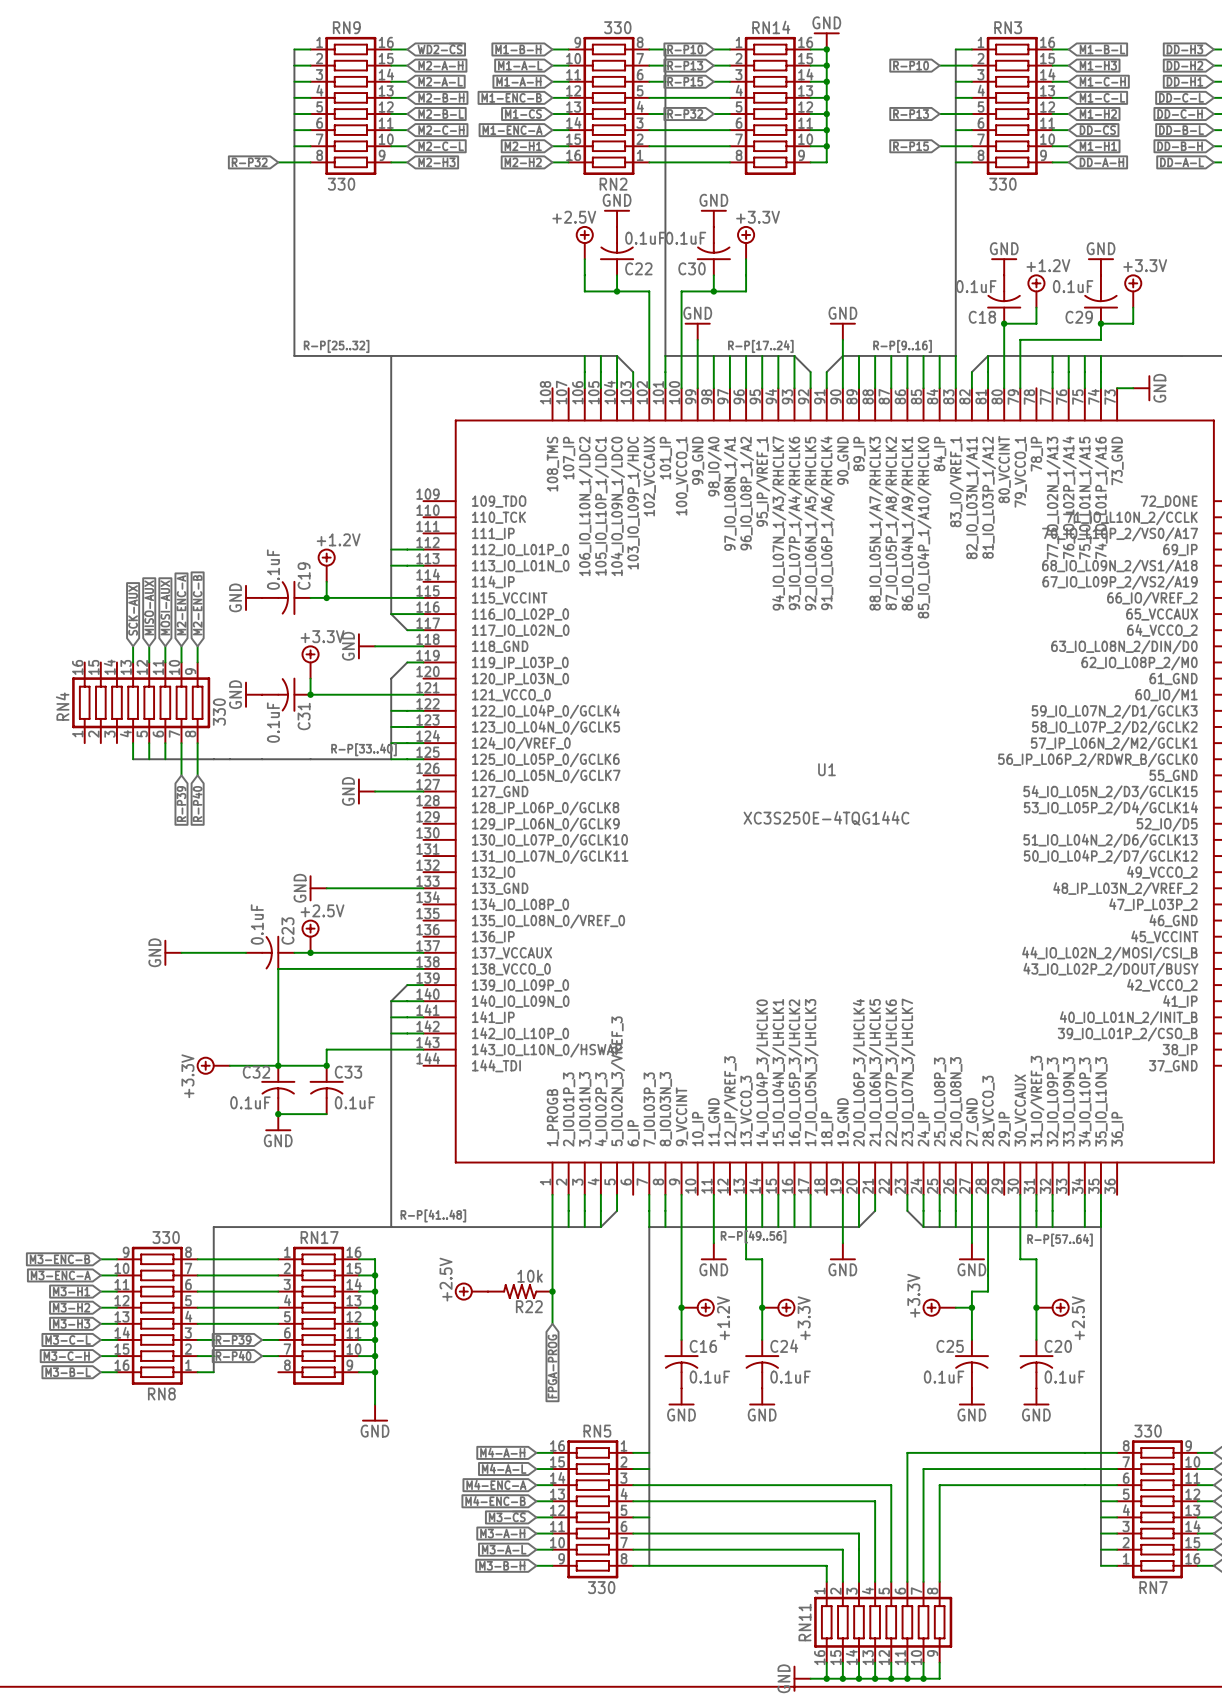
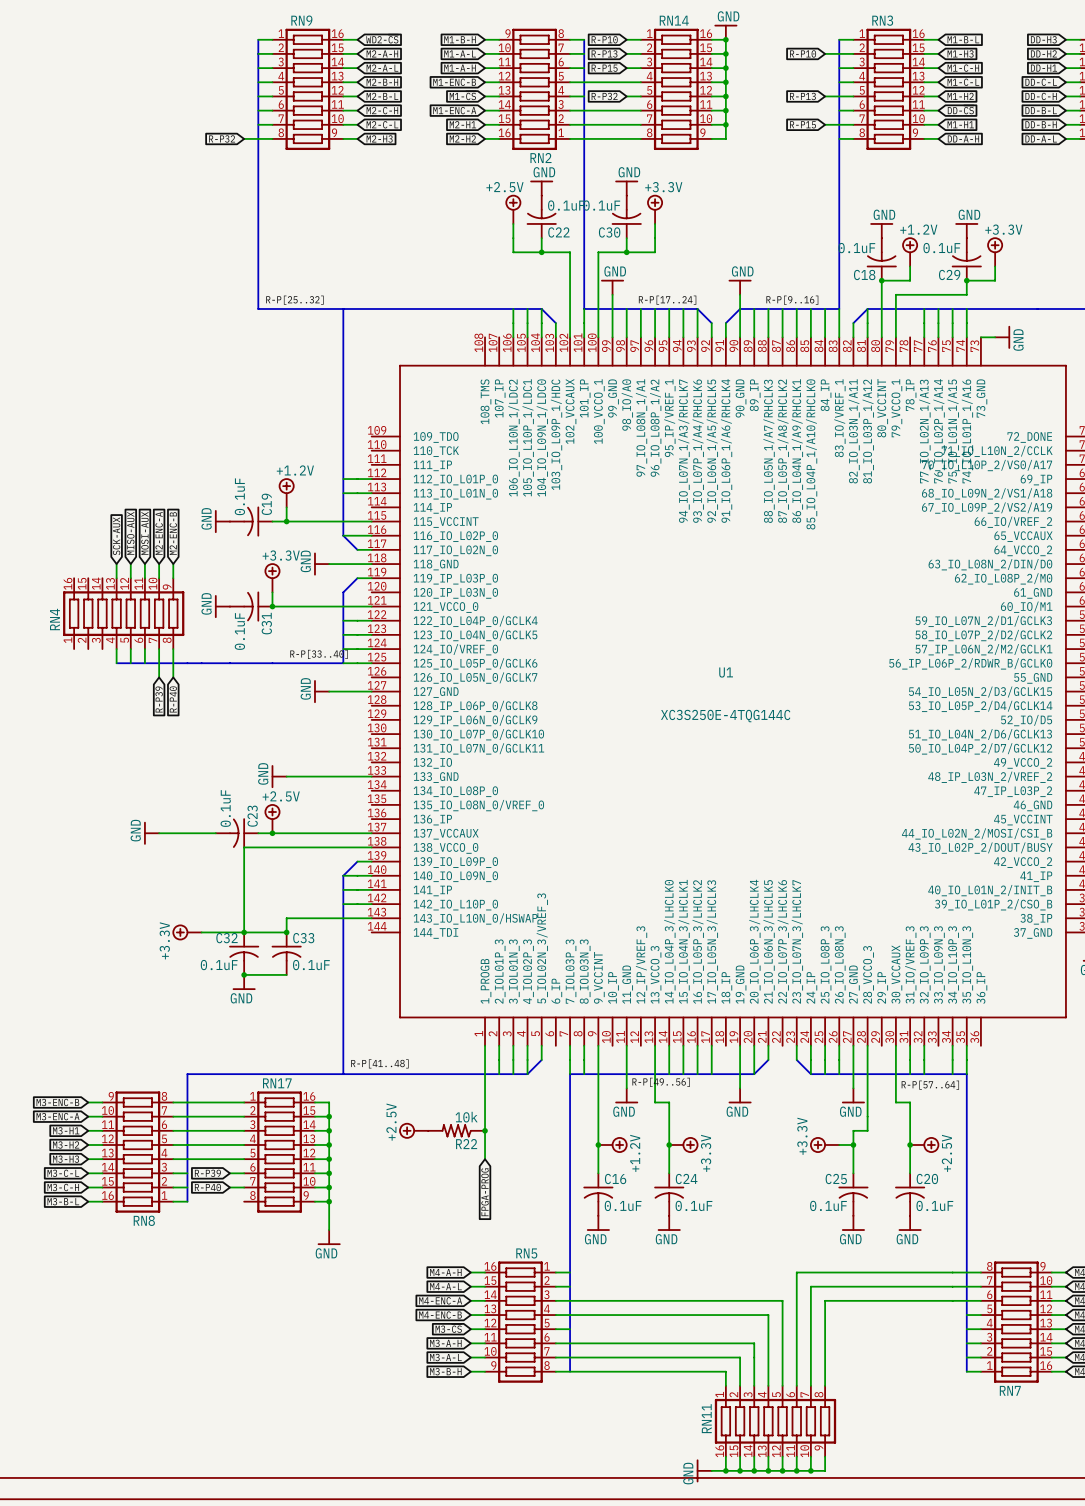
RN2 value: 330 (617, 27) -> none
RN9 value: 330 (341, 184) -> none
RN3 value: 330 (1002, 184) -> none
RN4 value: 330 (219, 712) -> none
RN8 value: 330 (166, 1237) -> none
RN7 value: 330 (1148, 1431) -> none
RN5 value: 330 (601, 1587) -> none

